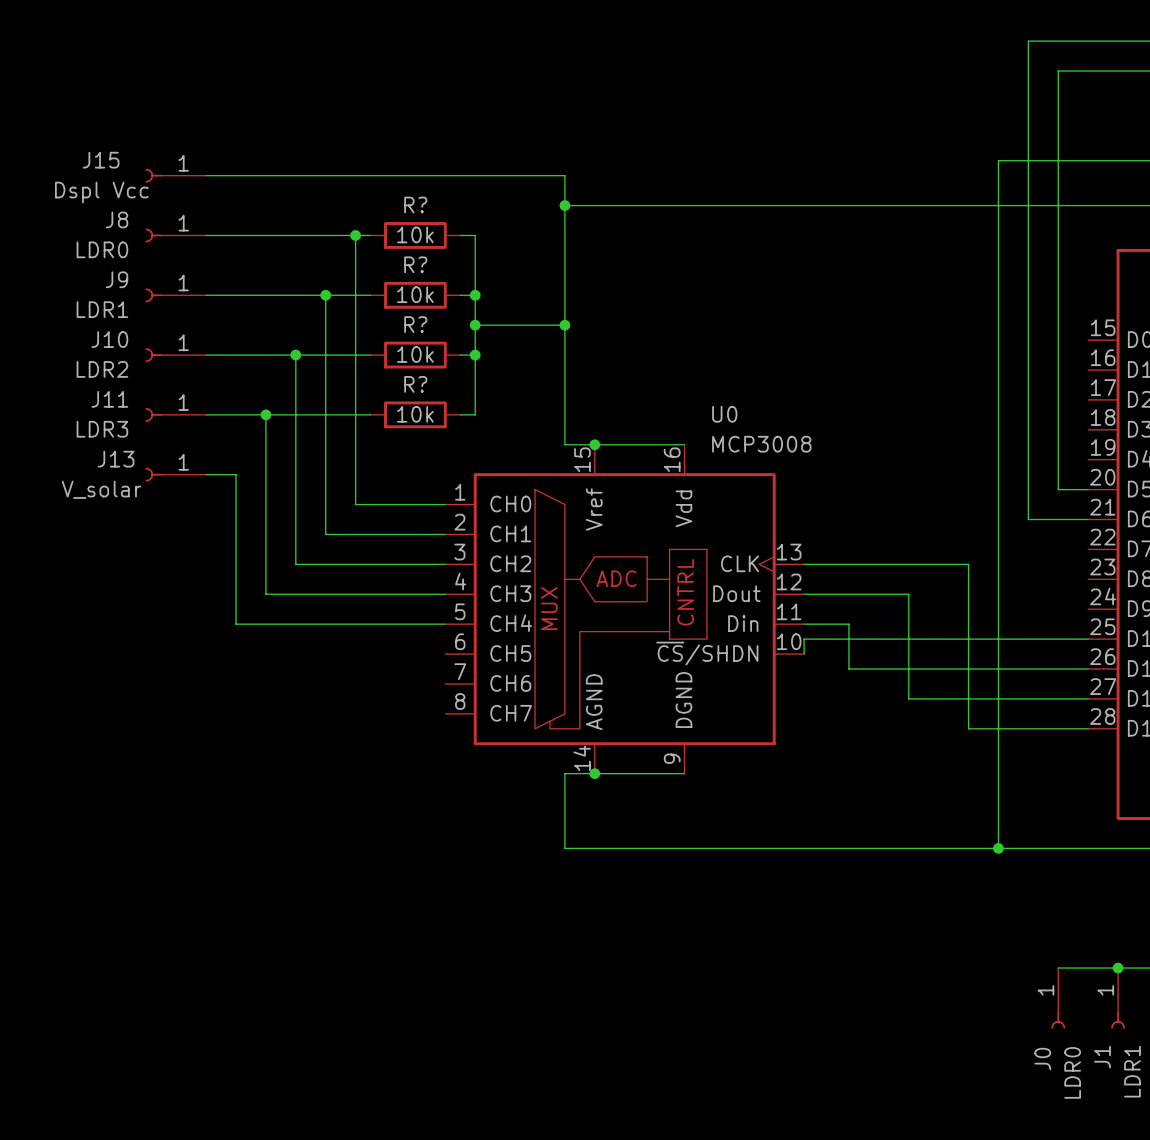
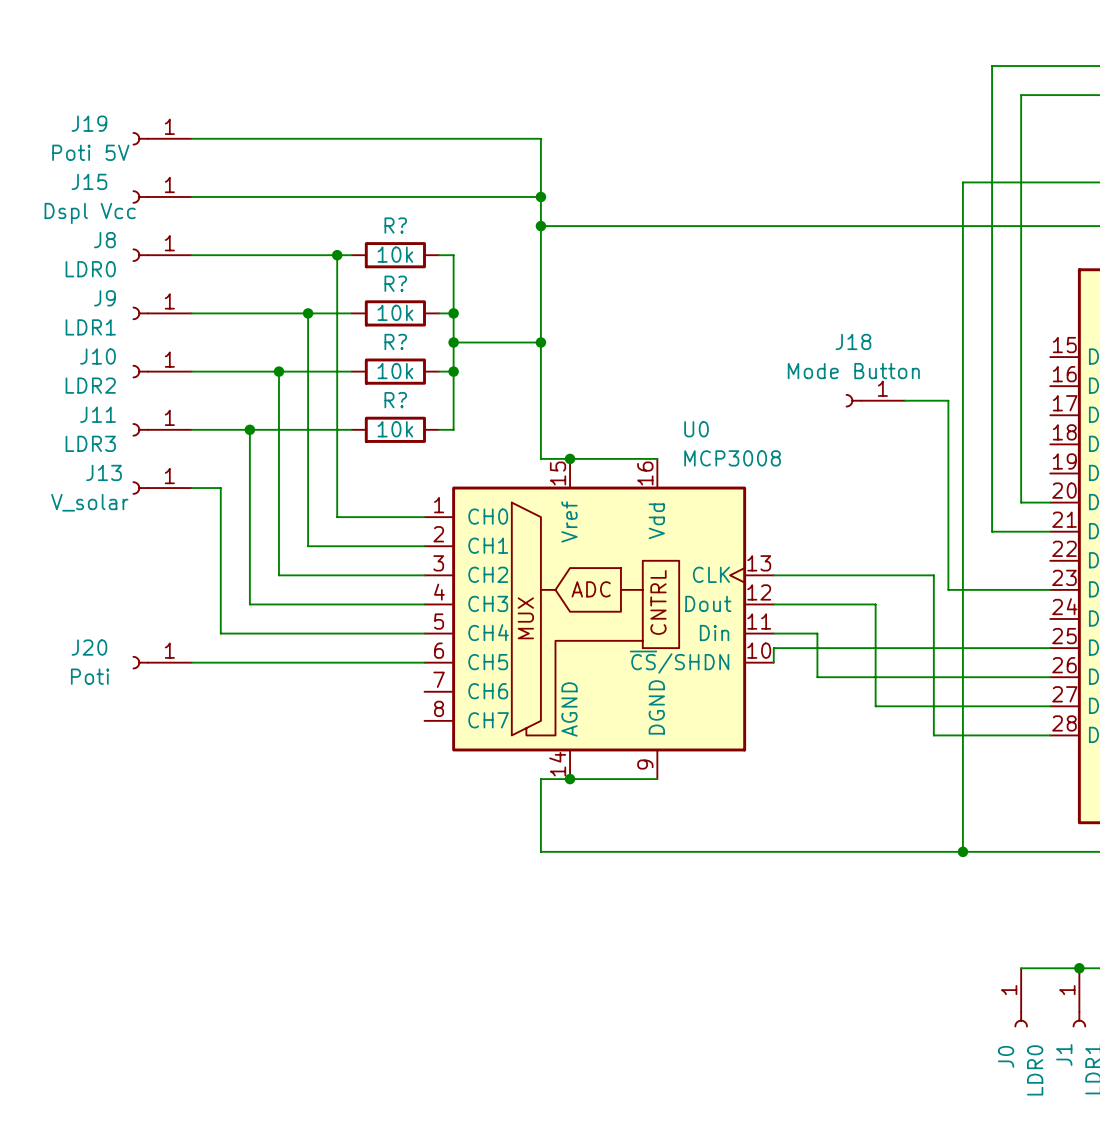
J19: none -> Poti 5V (162, 138)
wire: none -> (191, 138) (540, 138) (540, 196)
junction: none -> (540, 196)
J18: none -> Mode Button (875, 400)
wire: none -> (904, 400) (948, 400) (948, 589) (1050, 589)
J20: none -> Poti (162, 662)
wire: none -> (191, 662) (424, 662)

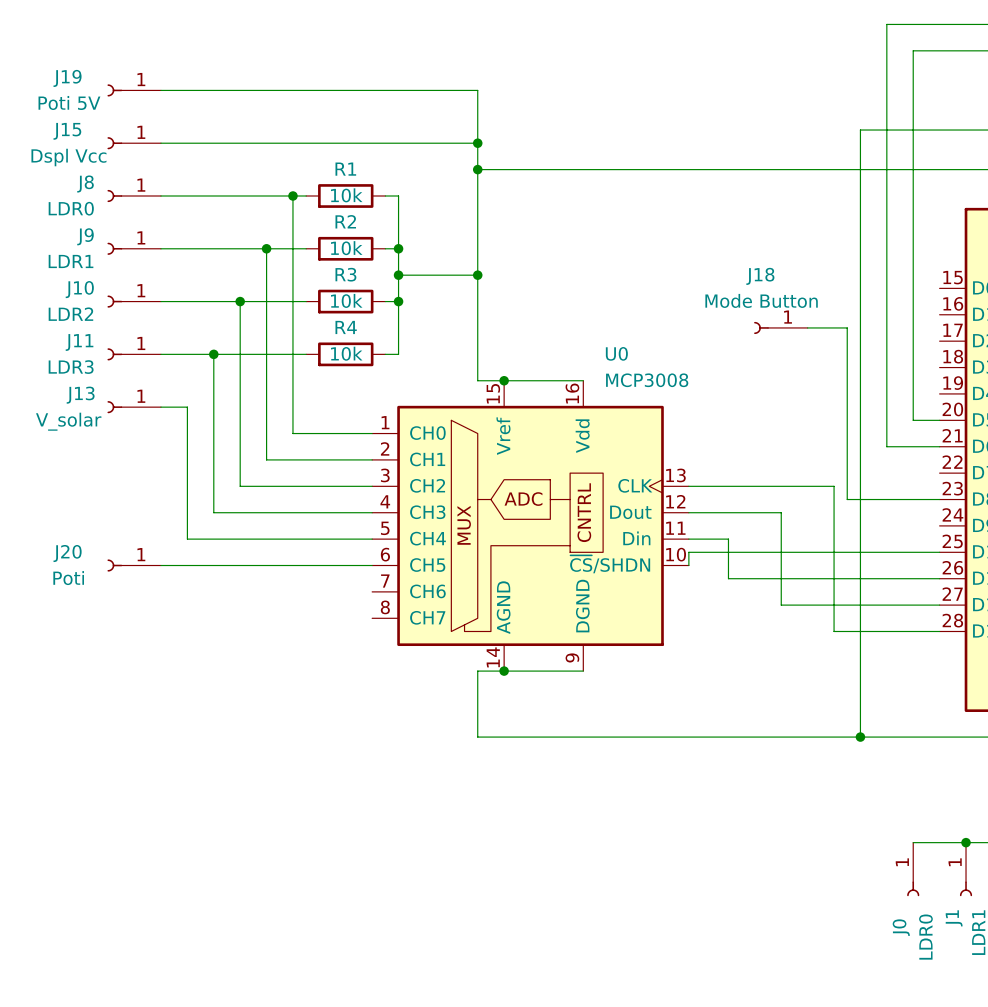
R? name: R? (395, 225) -> R1 (345, 169)
R? name: R? (395, 283) -> R2 (345, 221)
R? name: R? (395, 341) -> R3 (345, 274)
R? name: R? (395, 400) -> R4 (346, 327)

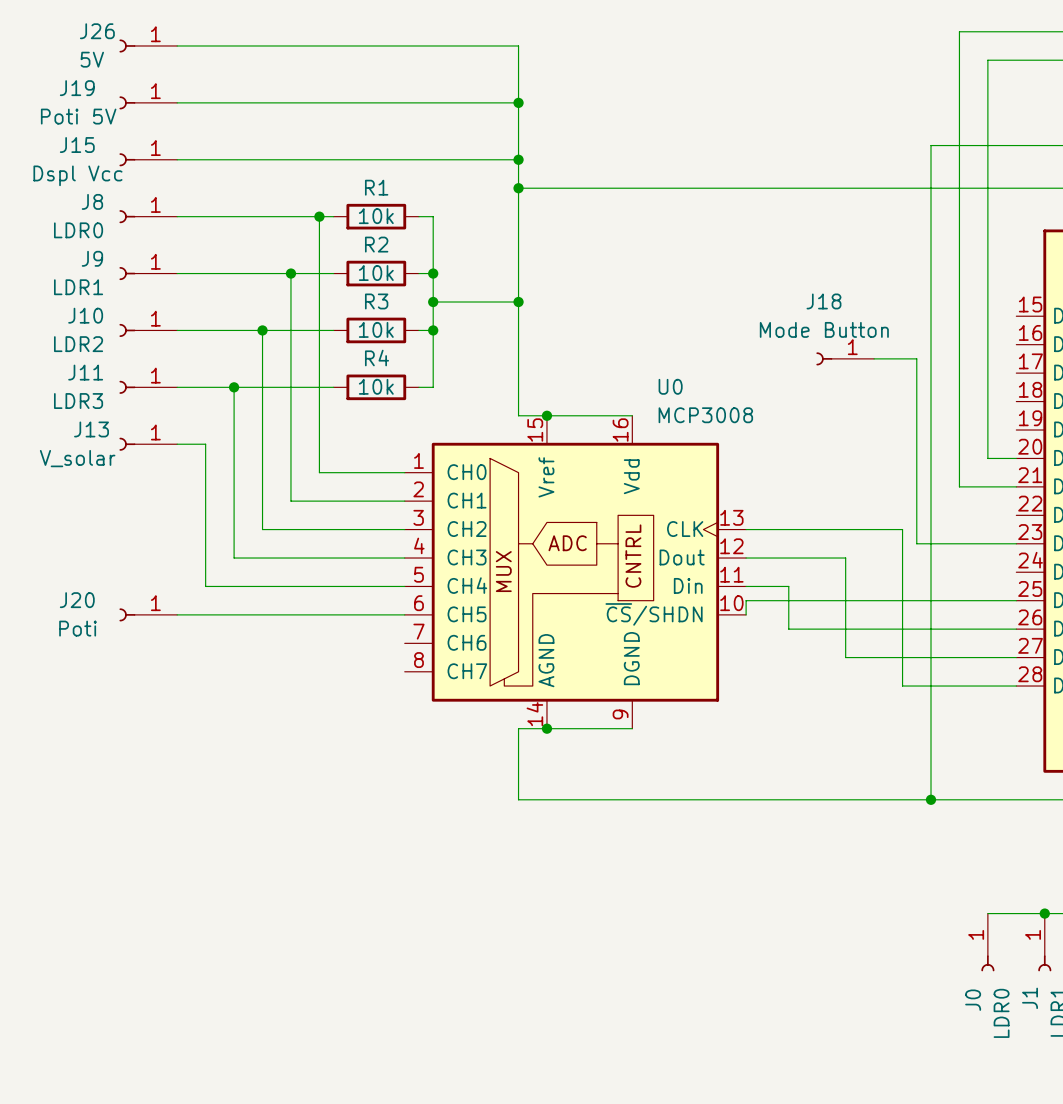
J26: none -> 5V (148, 45)
wire: none -> (177, 45) (518, 45) (518, 102)
junction: none -> (518, 102)

